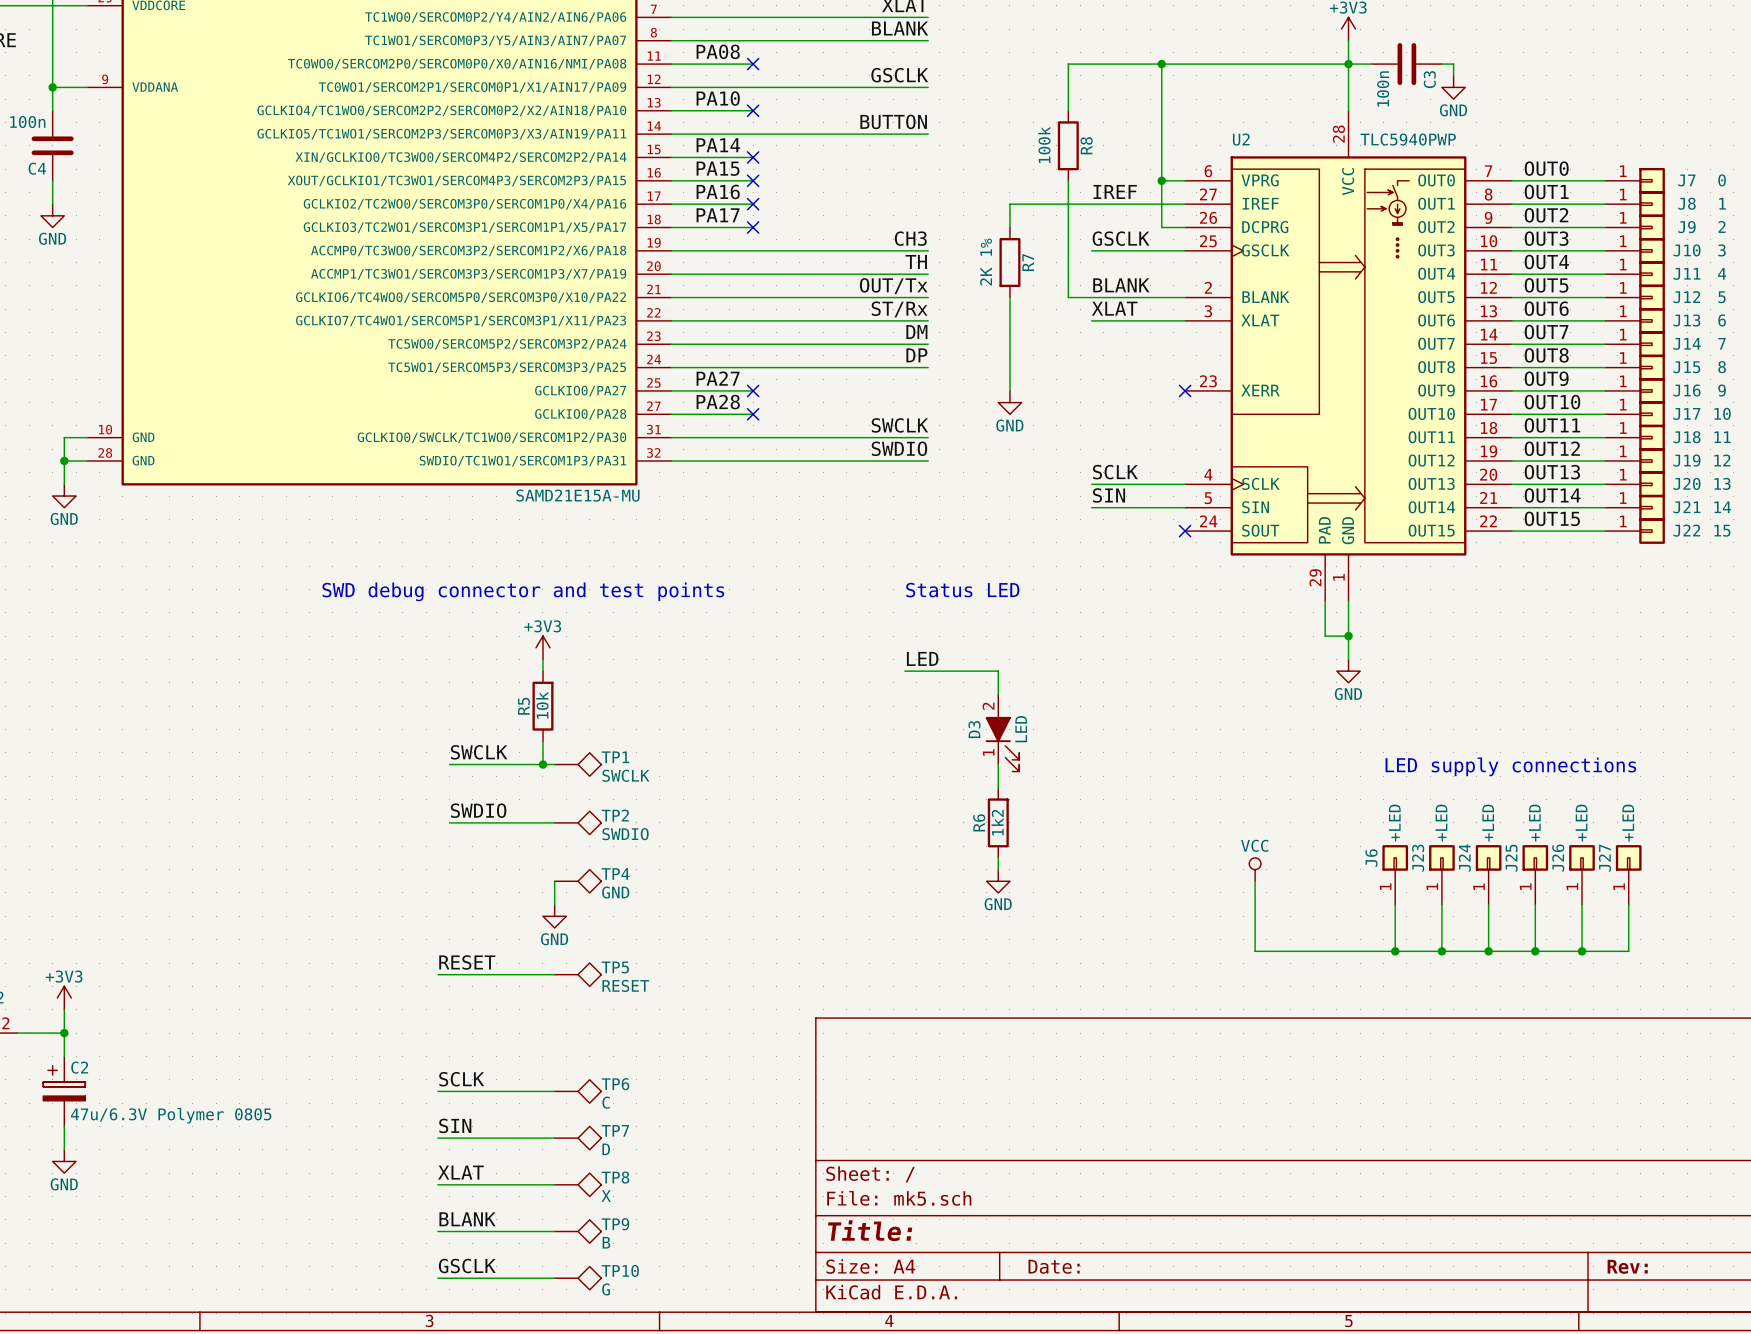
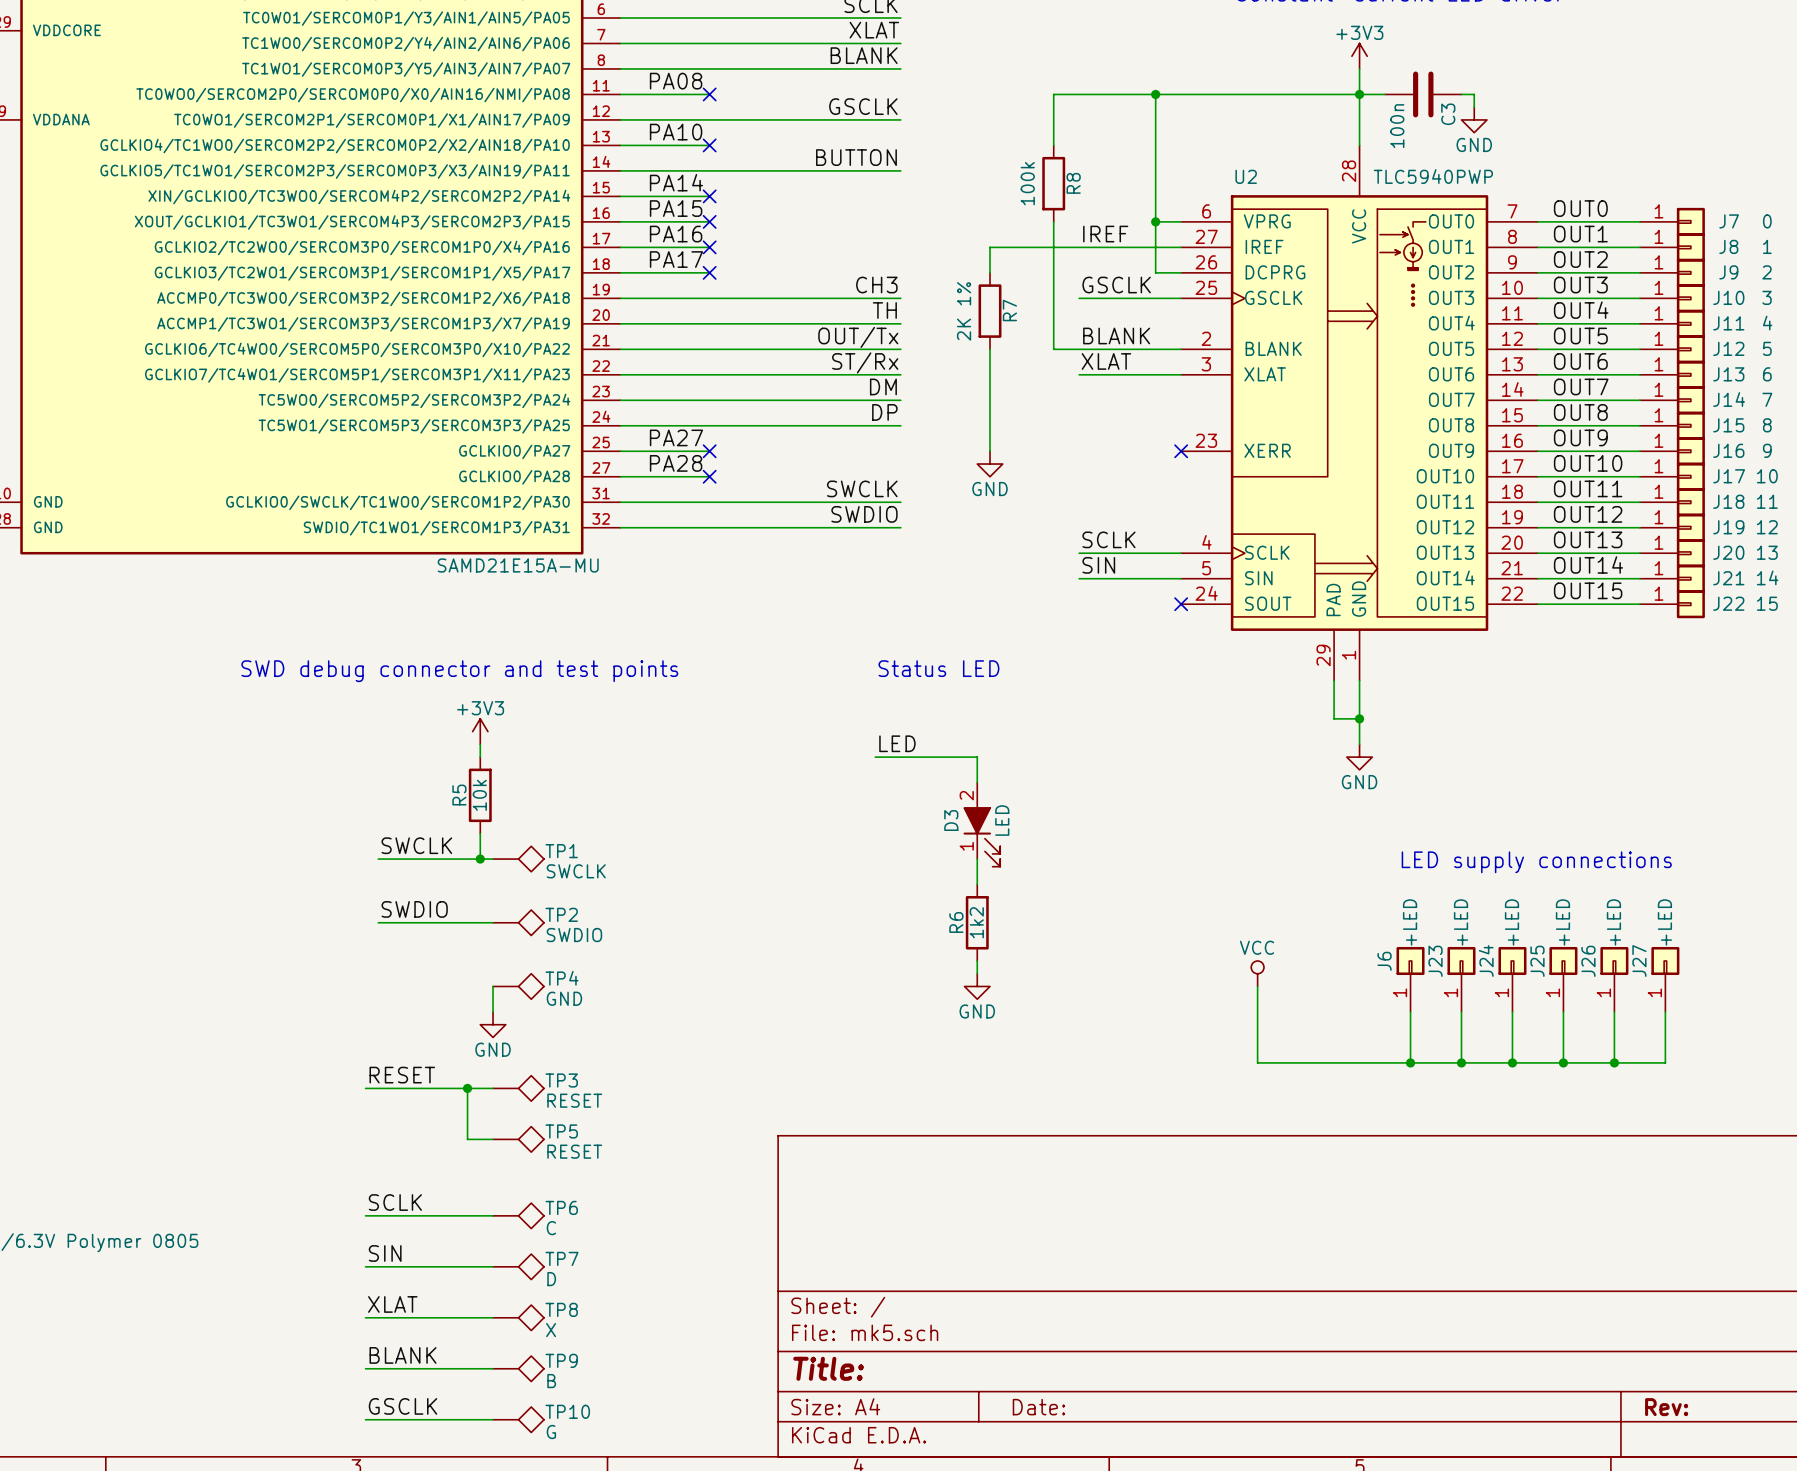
TP5 name: TP5 (615, 967) -> TP3 (561, 1080)
wire: none -> (467, 1088) (467, 1139) (493, 1139)
junction: none -> (467, 1088)
TP5: none -> RESET (518, 1139)

